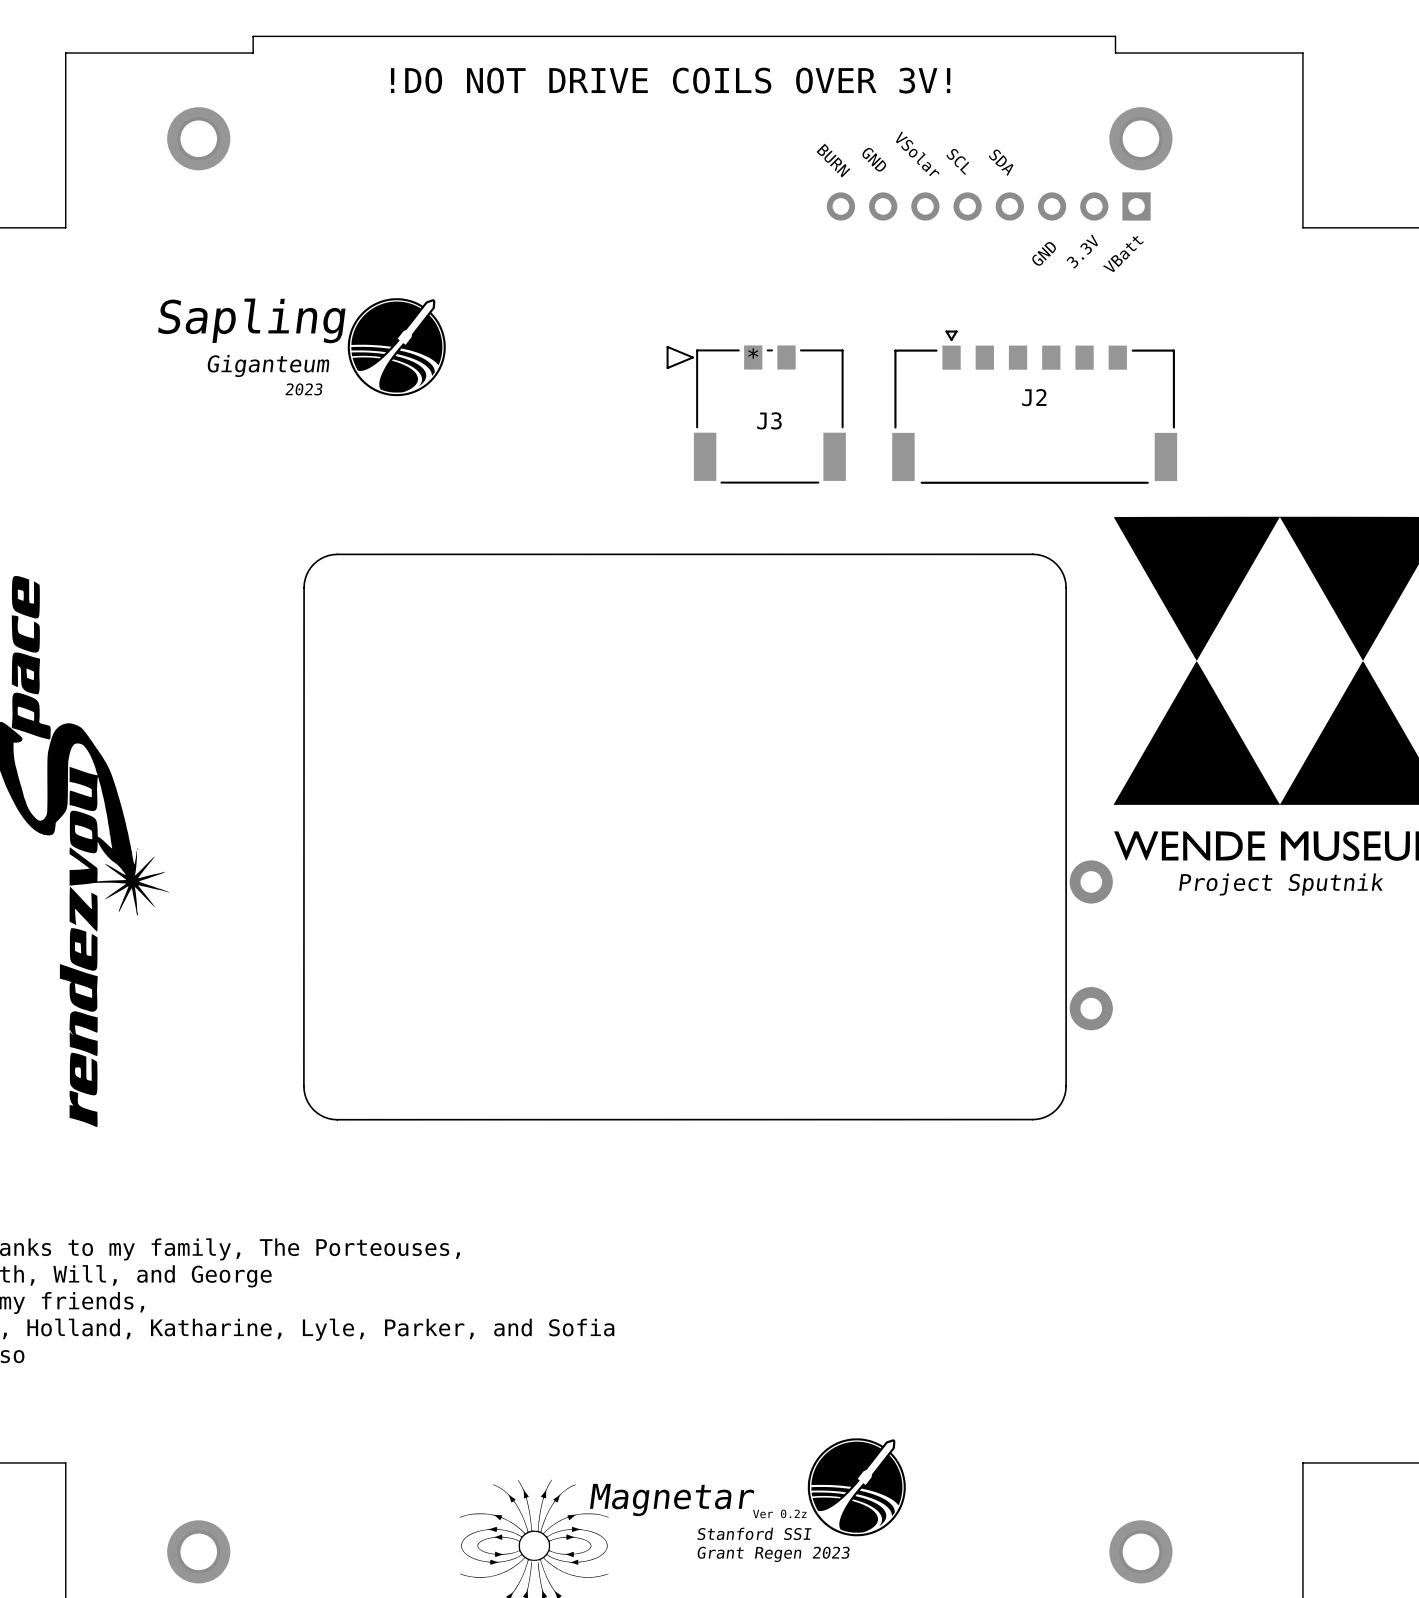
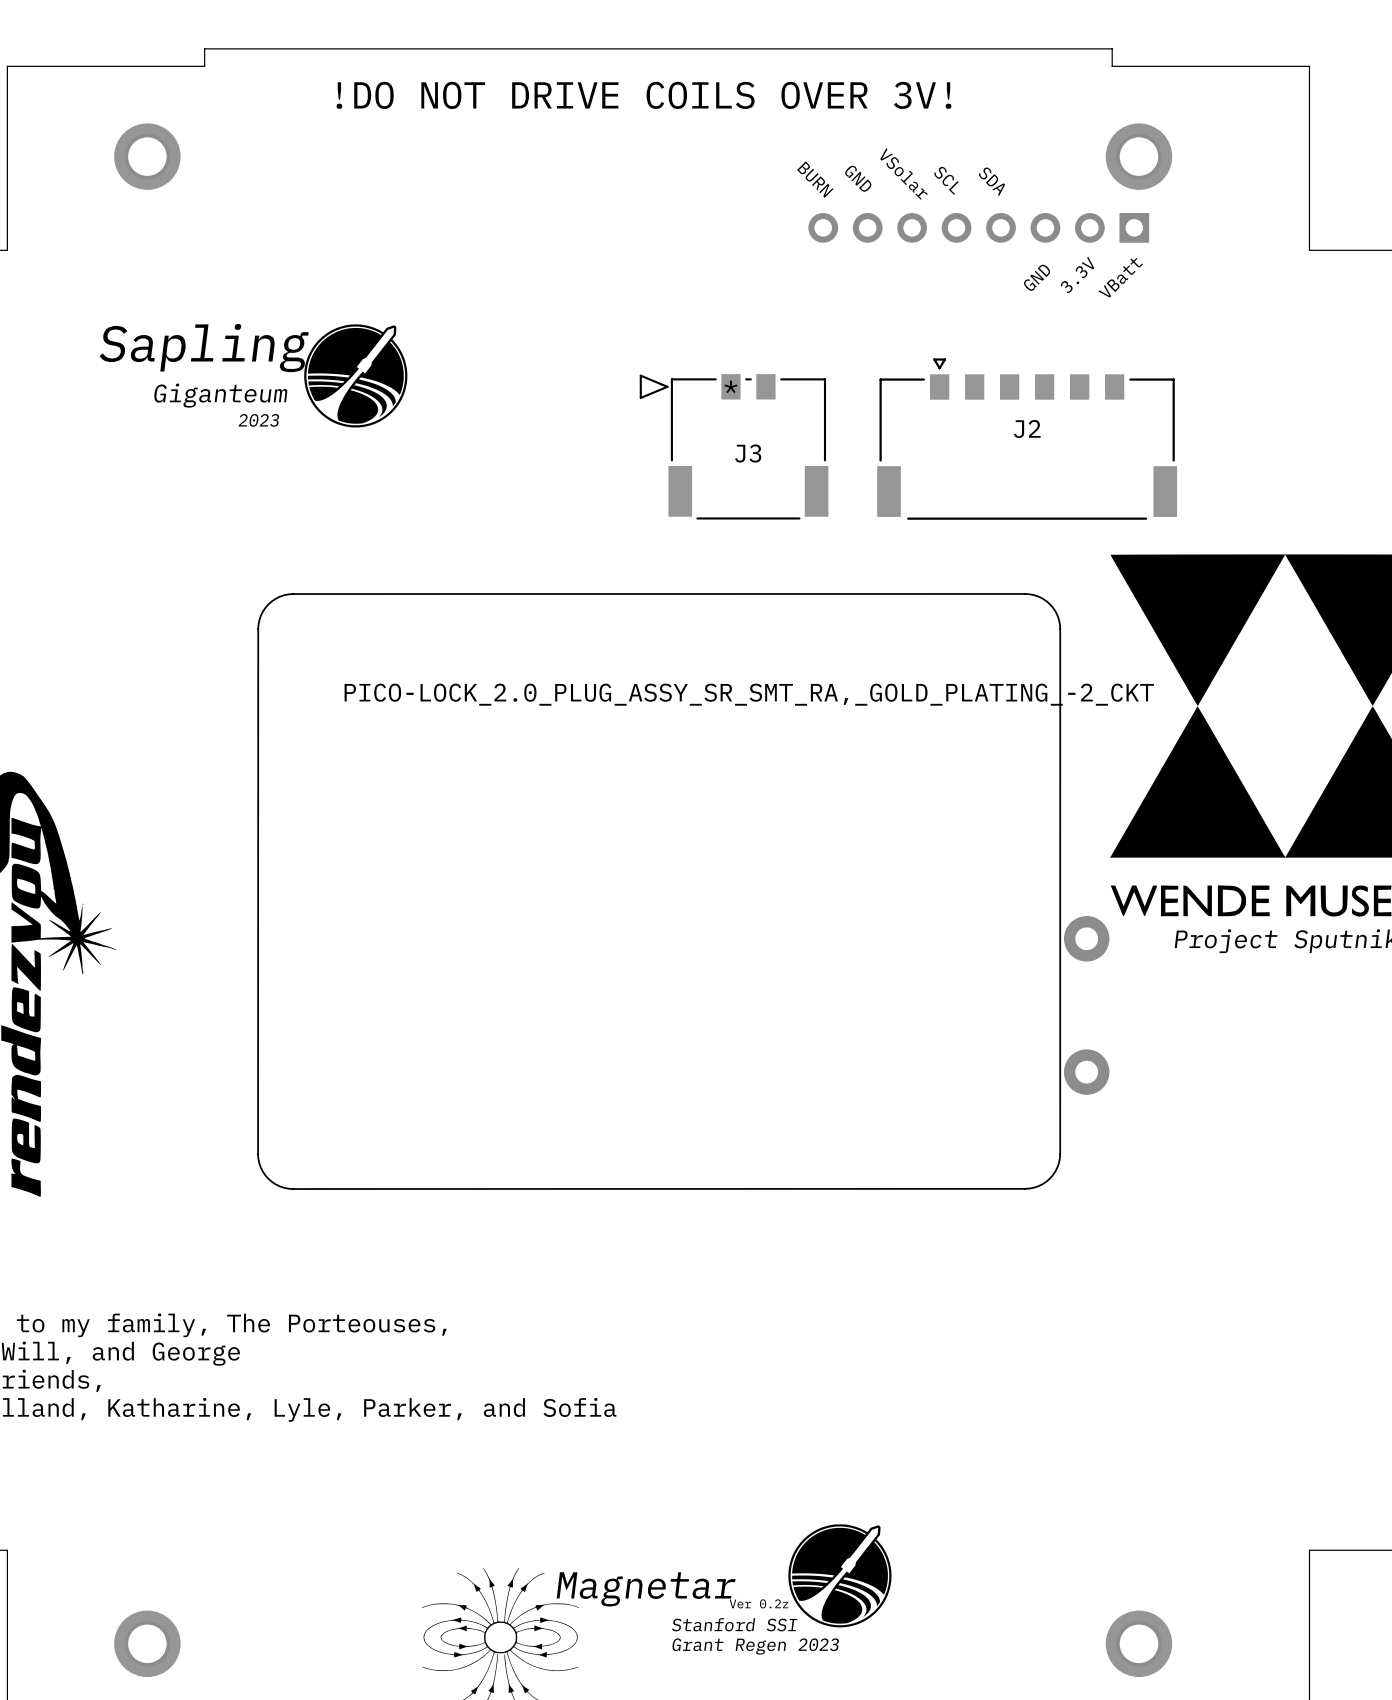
J3 text: none -> PICO-LOCK_2.0_PLUG_ASSY_SR_SMT_RA,_GOLD_PLATING_-2_CKT (749, 694)

